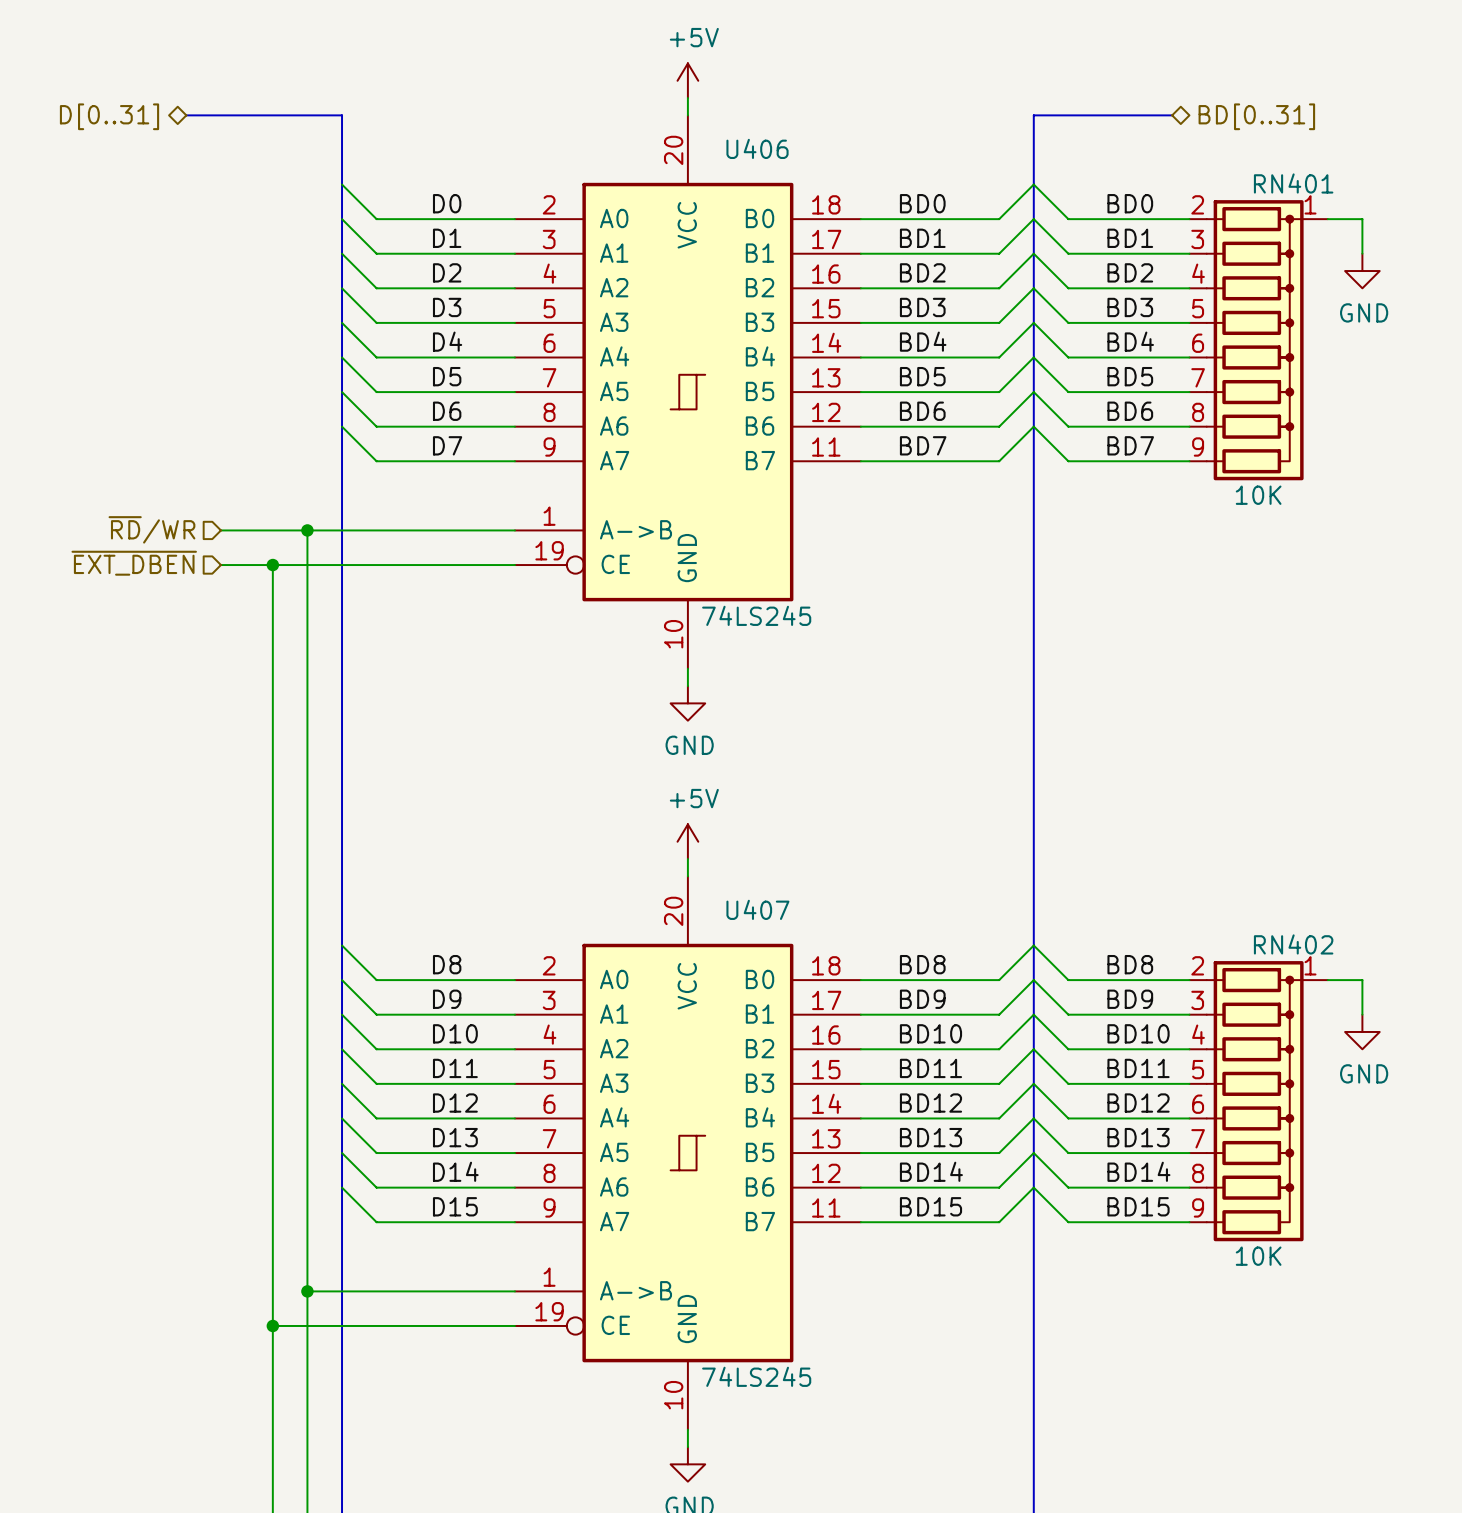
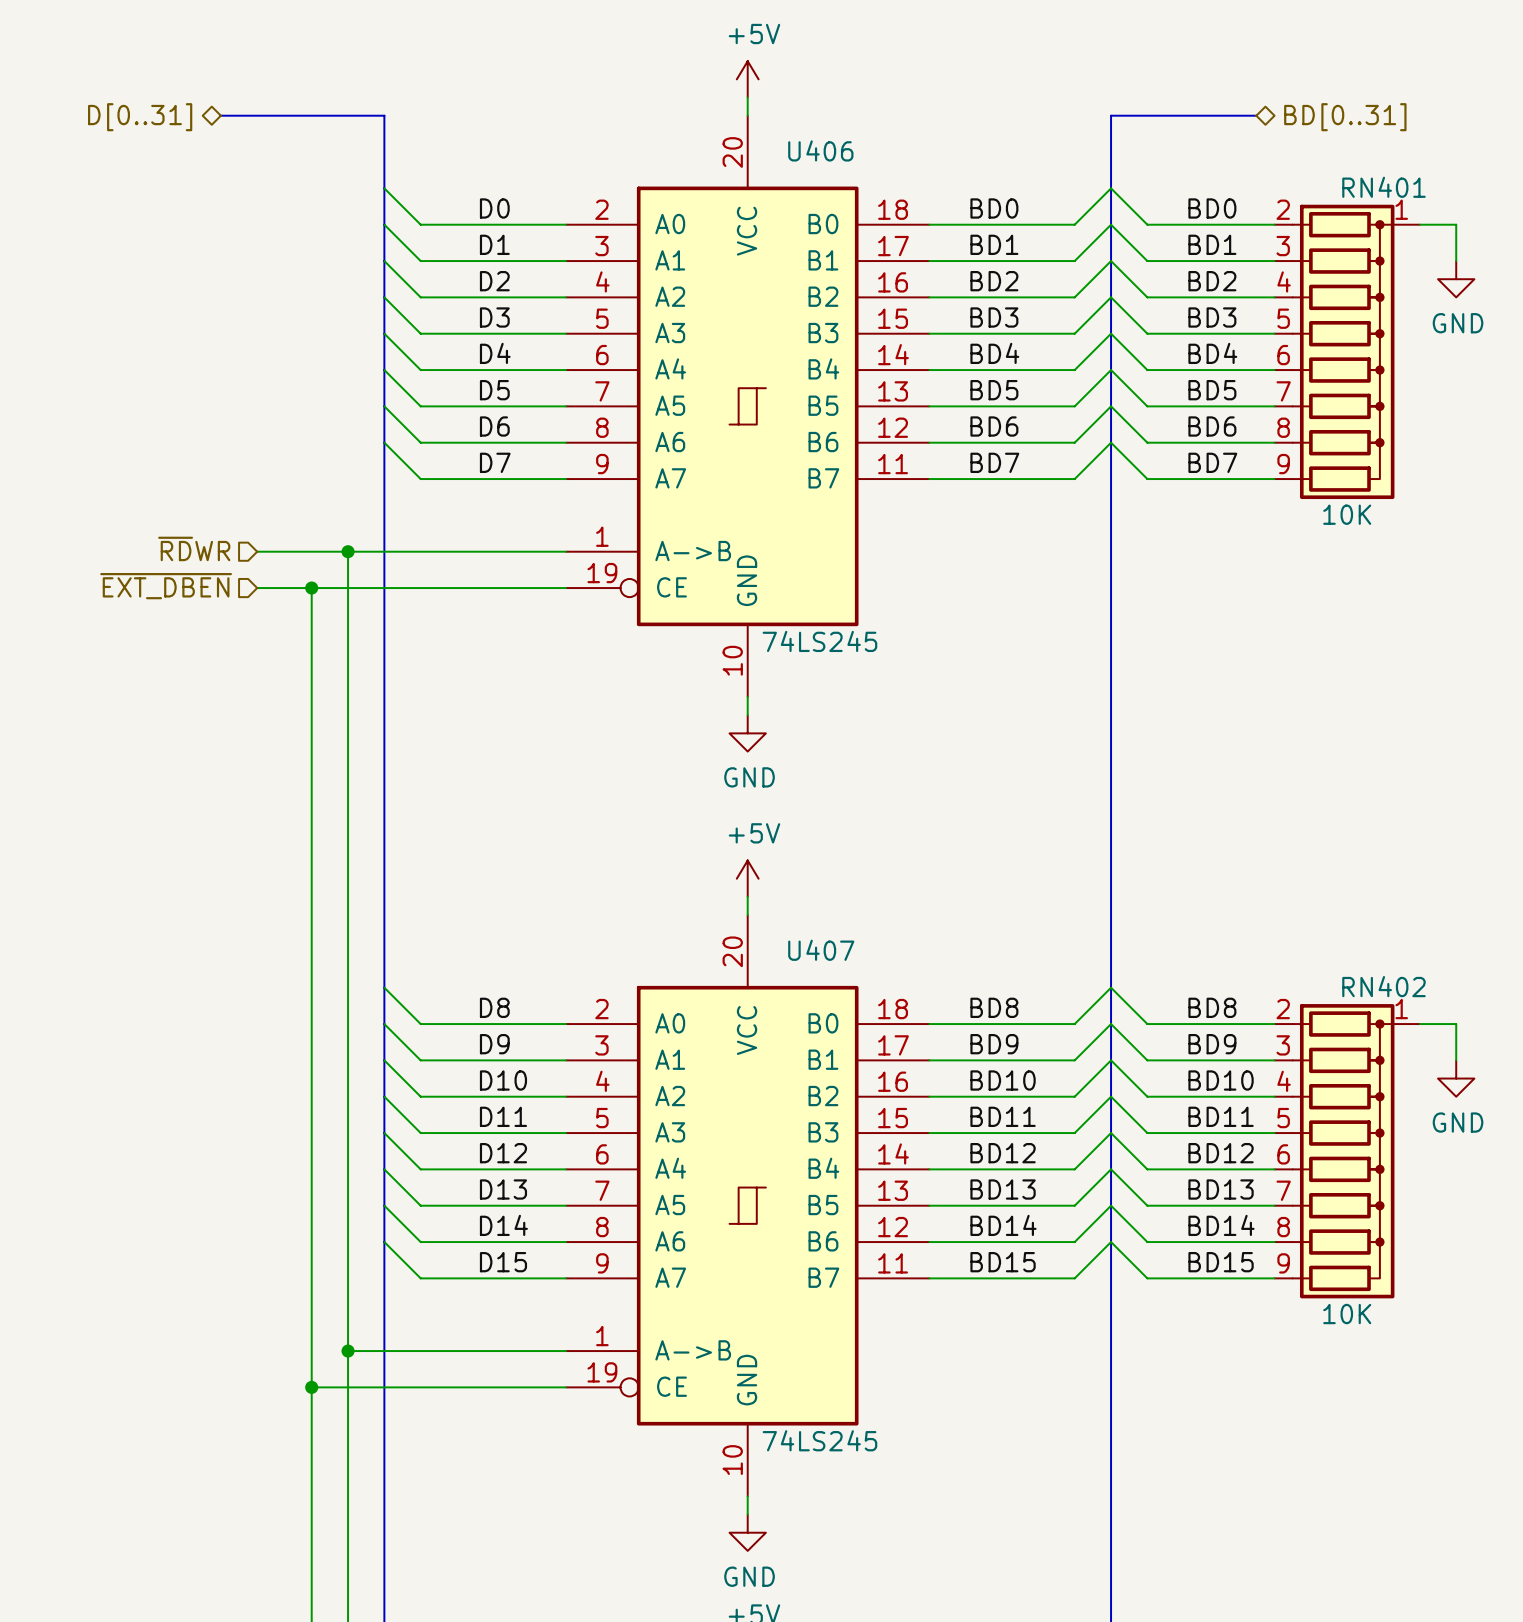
hierarchical label: ~{RD}/WR (151, 529) -> ~{RD}WR (194, 548)

